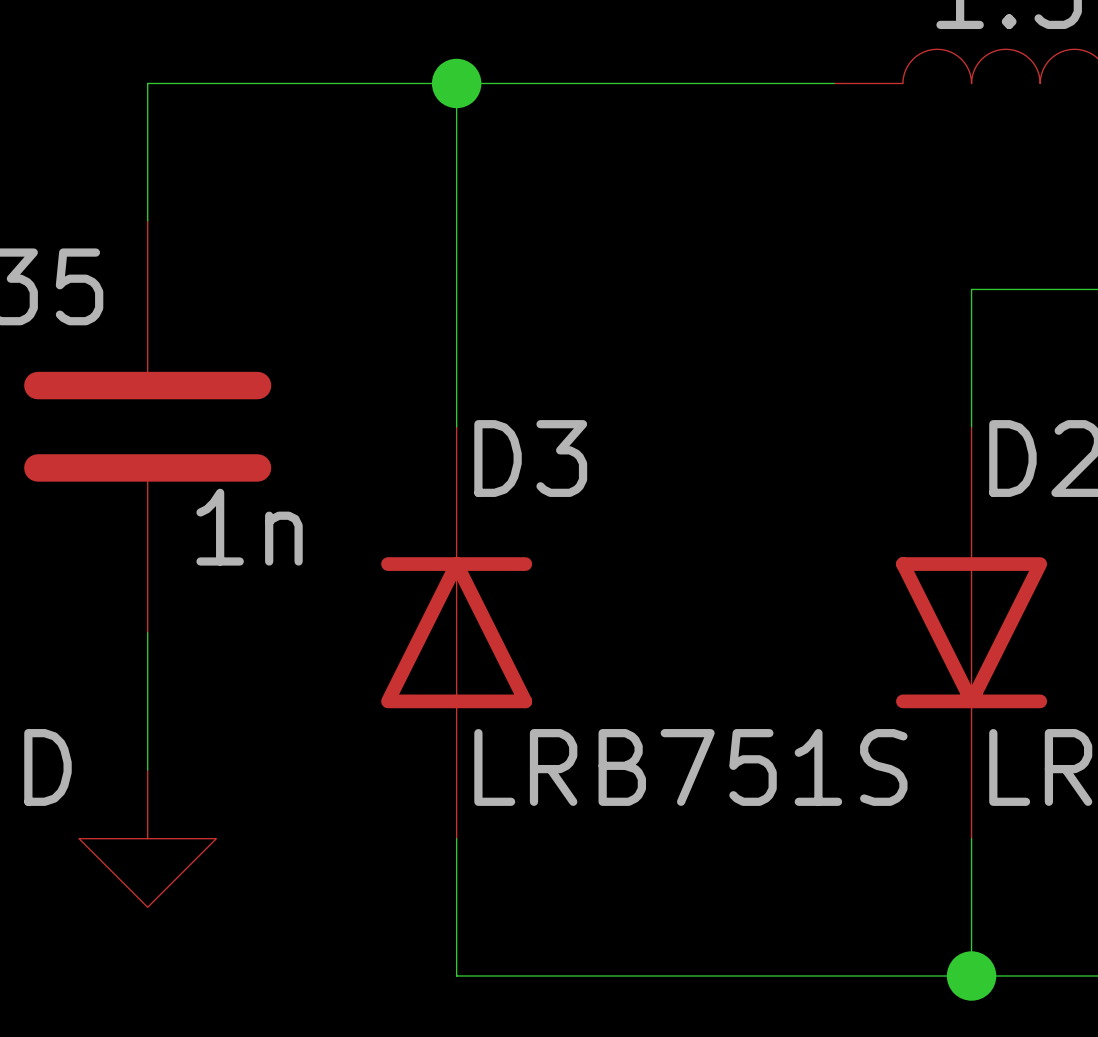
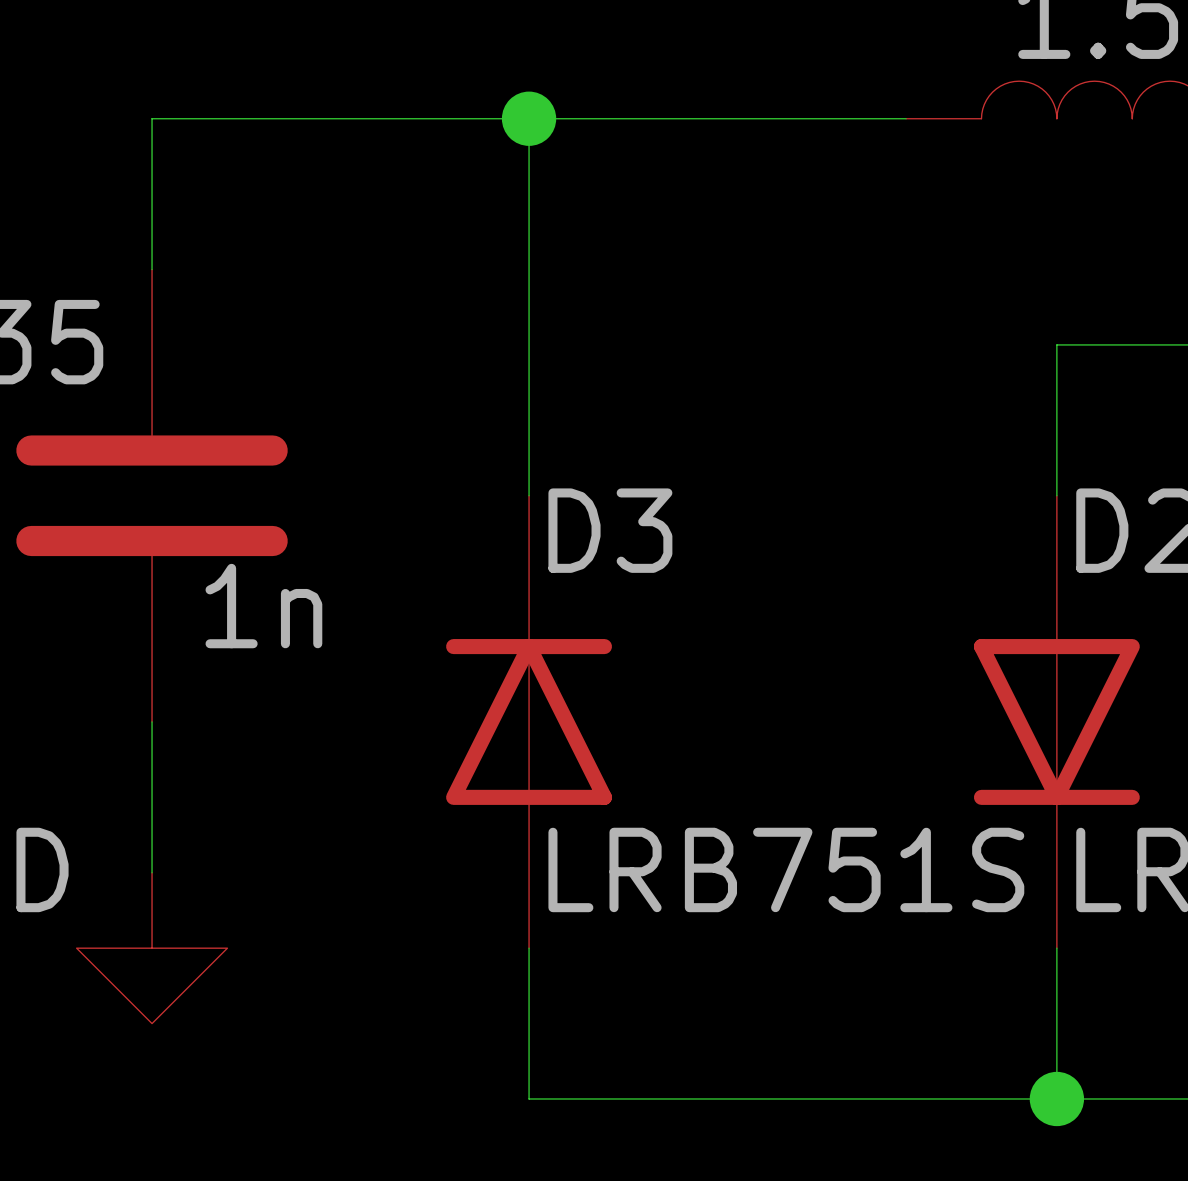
wire: (456, 83) (456, 426) -> (529, 118) (529, 495)
junction position: (456, 83) -> (529, 118)
D3 position: (456, 632) -> (529, 721)
wire: (456, 838) (456, 975) (490, 975) -> (529, 948) (529, 1098)

